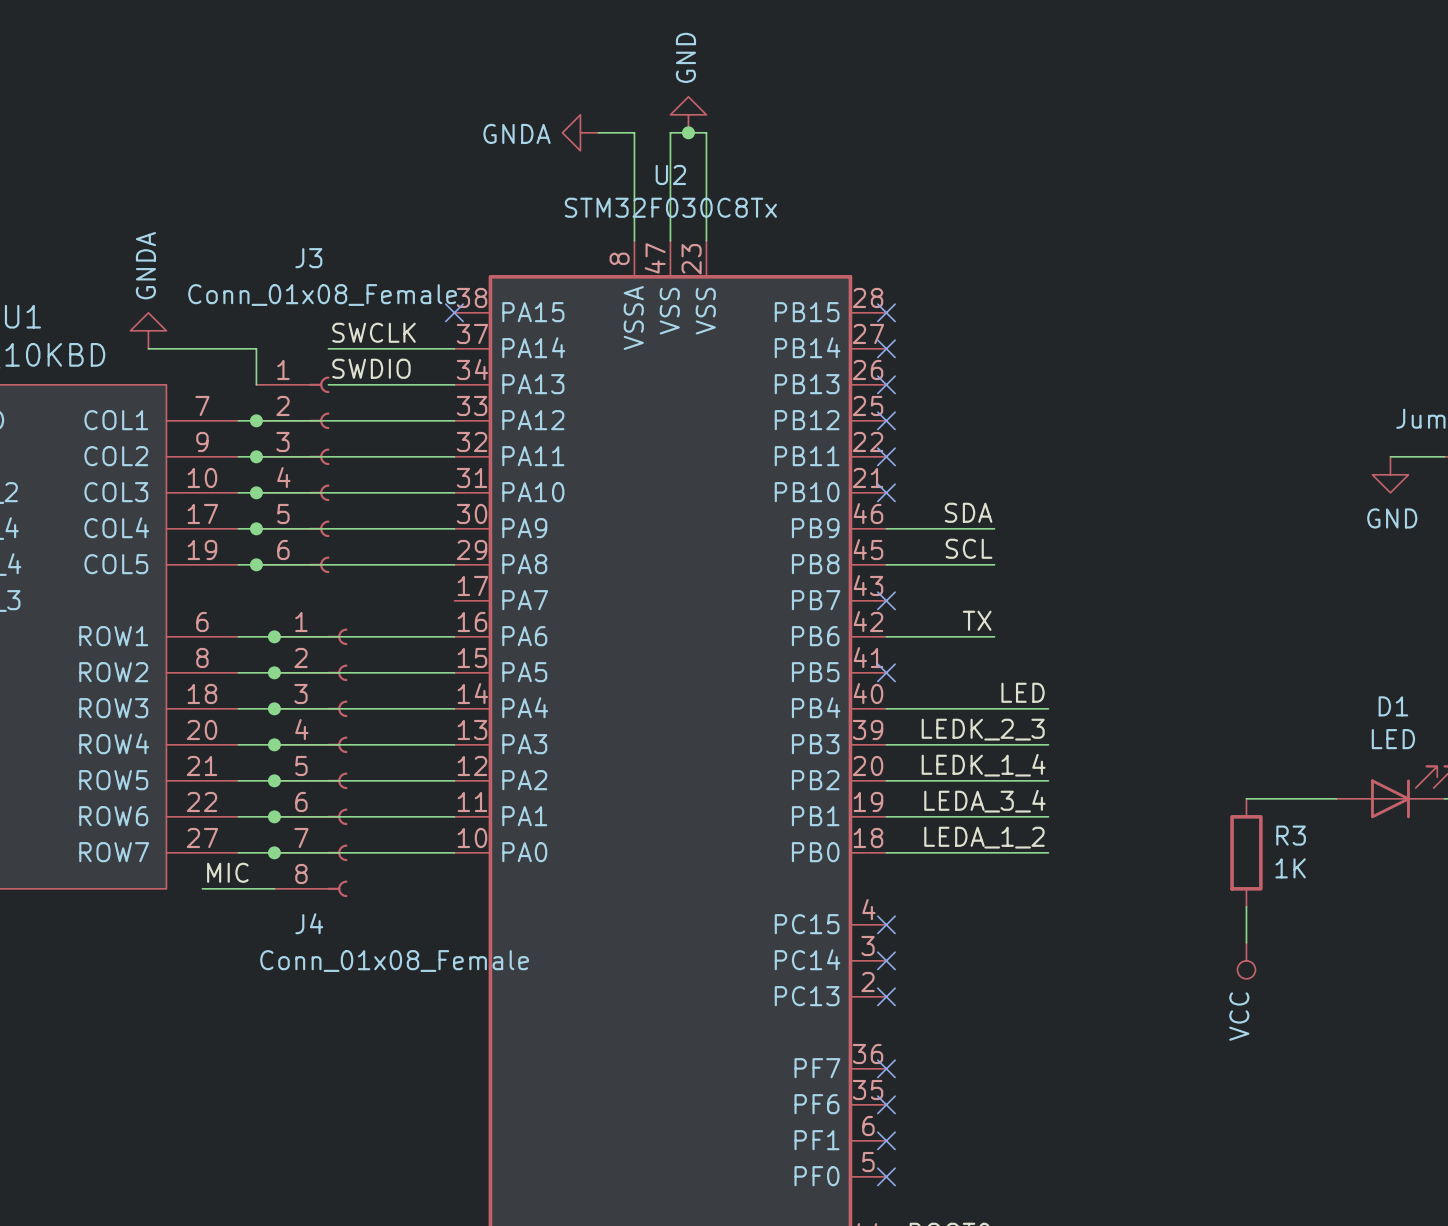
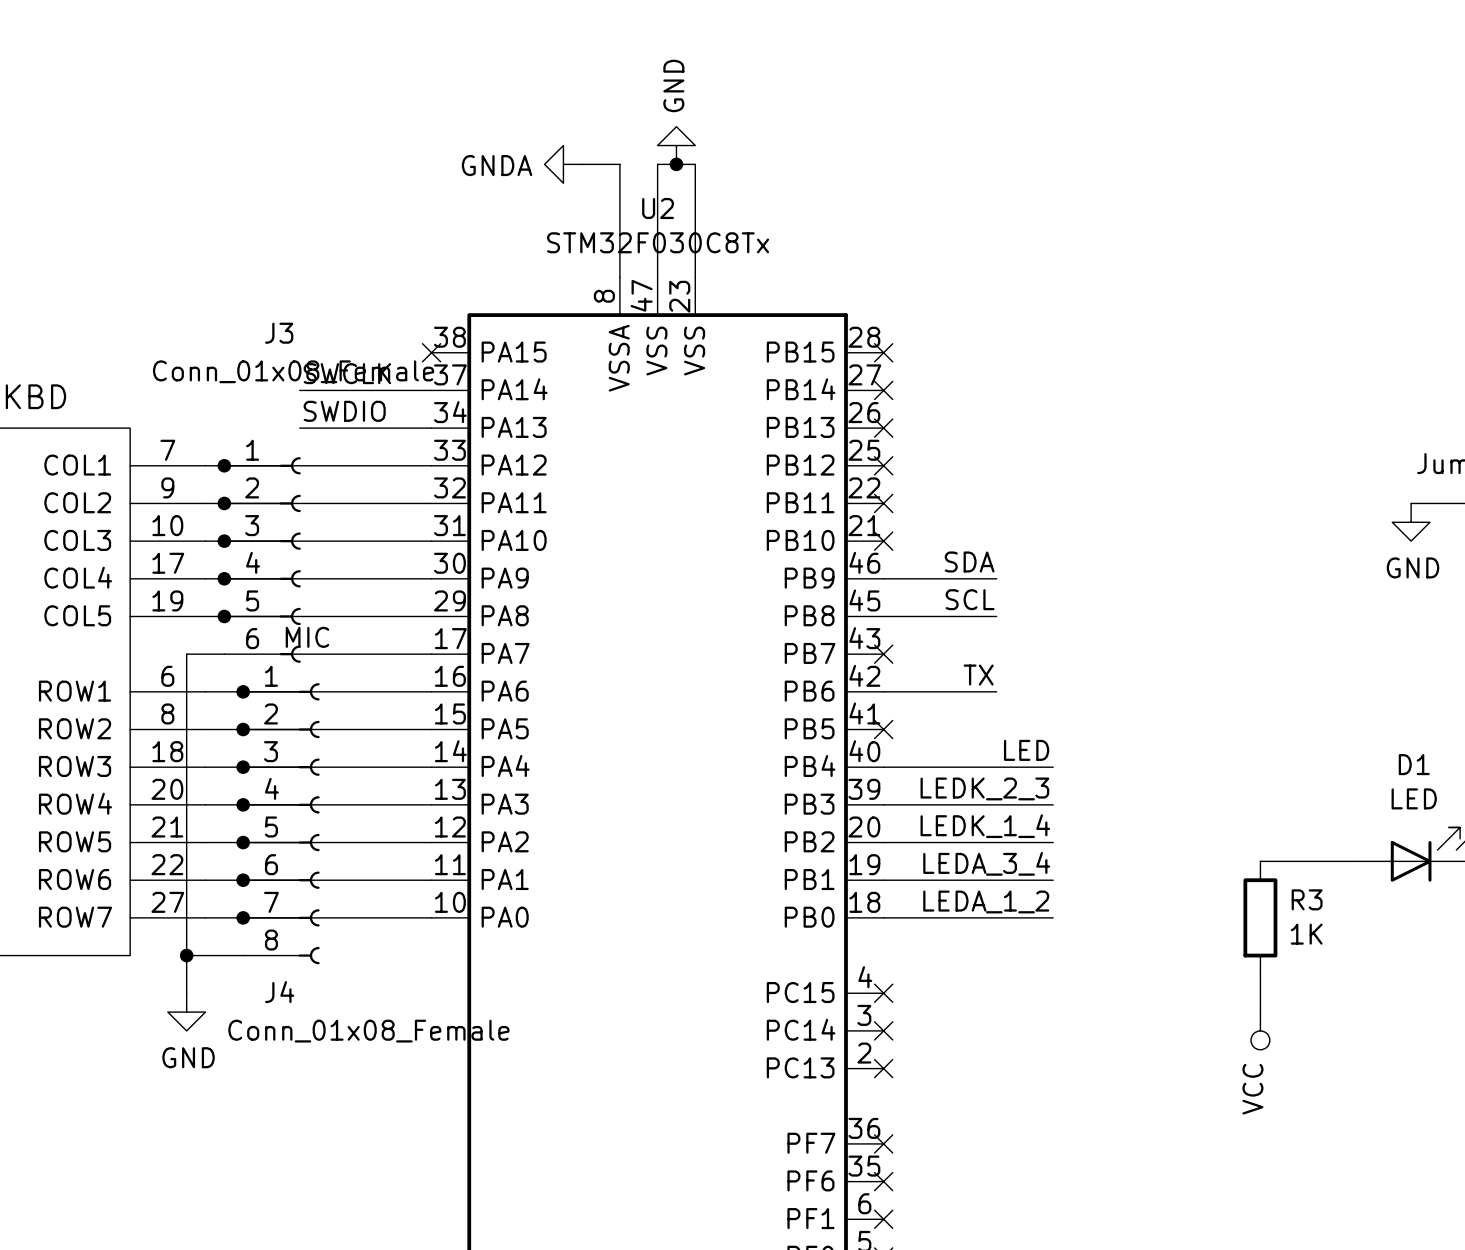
power symbol: GNDA (148, 330) -> none
wire: (148, 348) (256, 348) (256, 384) -> none
J3 position: (292, 474) -> (262, 559)
wire: none -> (224, 654) (186, 654) (186, 993)
wire: none -> (280, 654) (431, 654)
label position: MIC (227, 872) -> MIC (307, 637)
wire: (202, 888) (220, 888) -> none
junction: none -> (186, 955)
power symbol: none -> GND (186, 1012)

